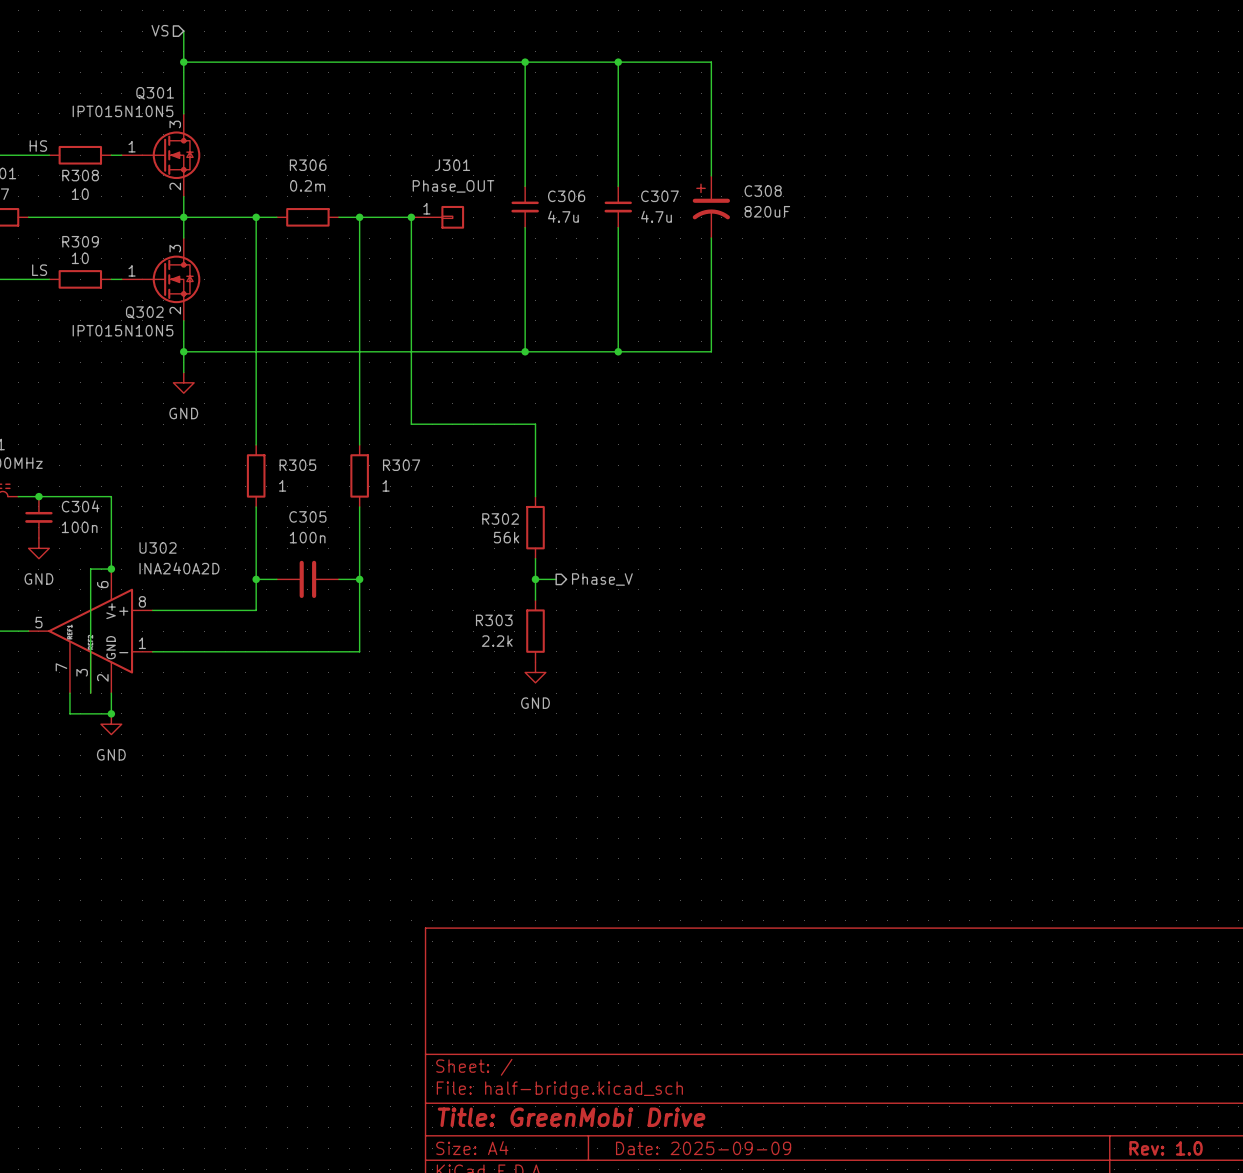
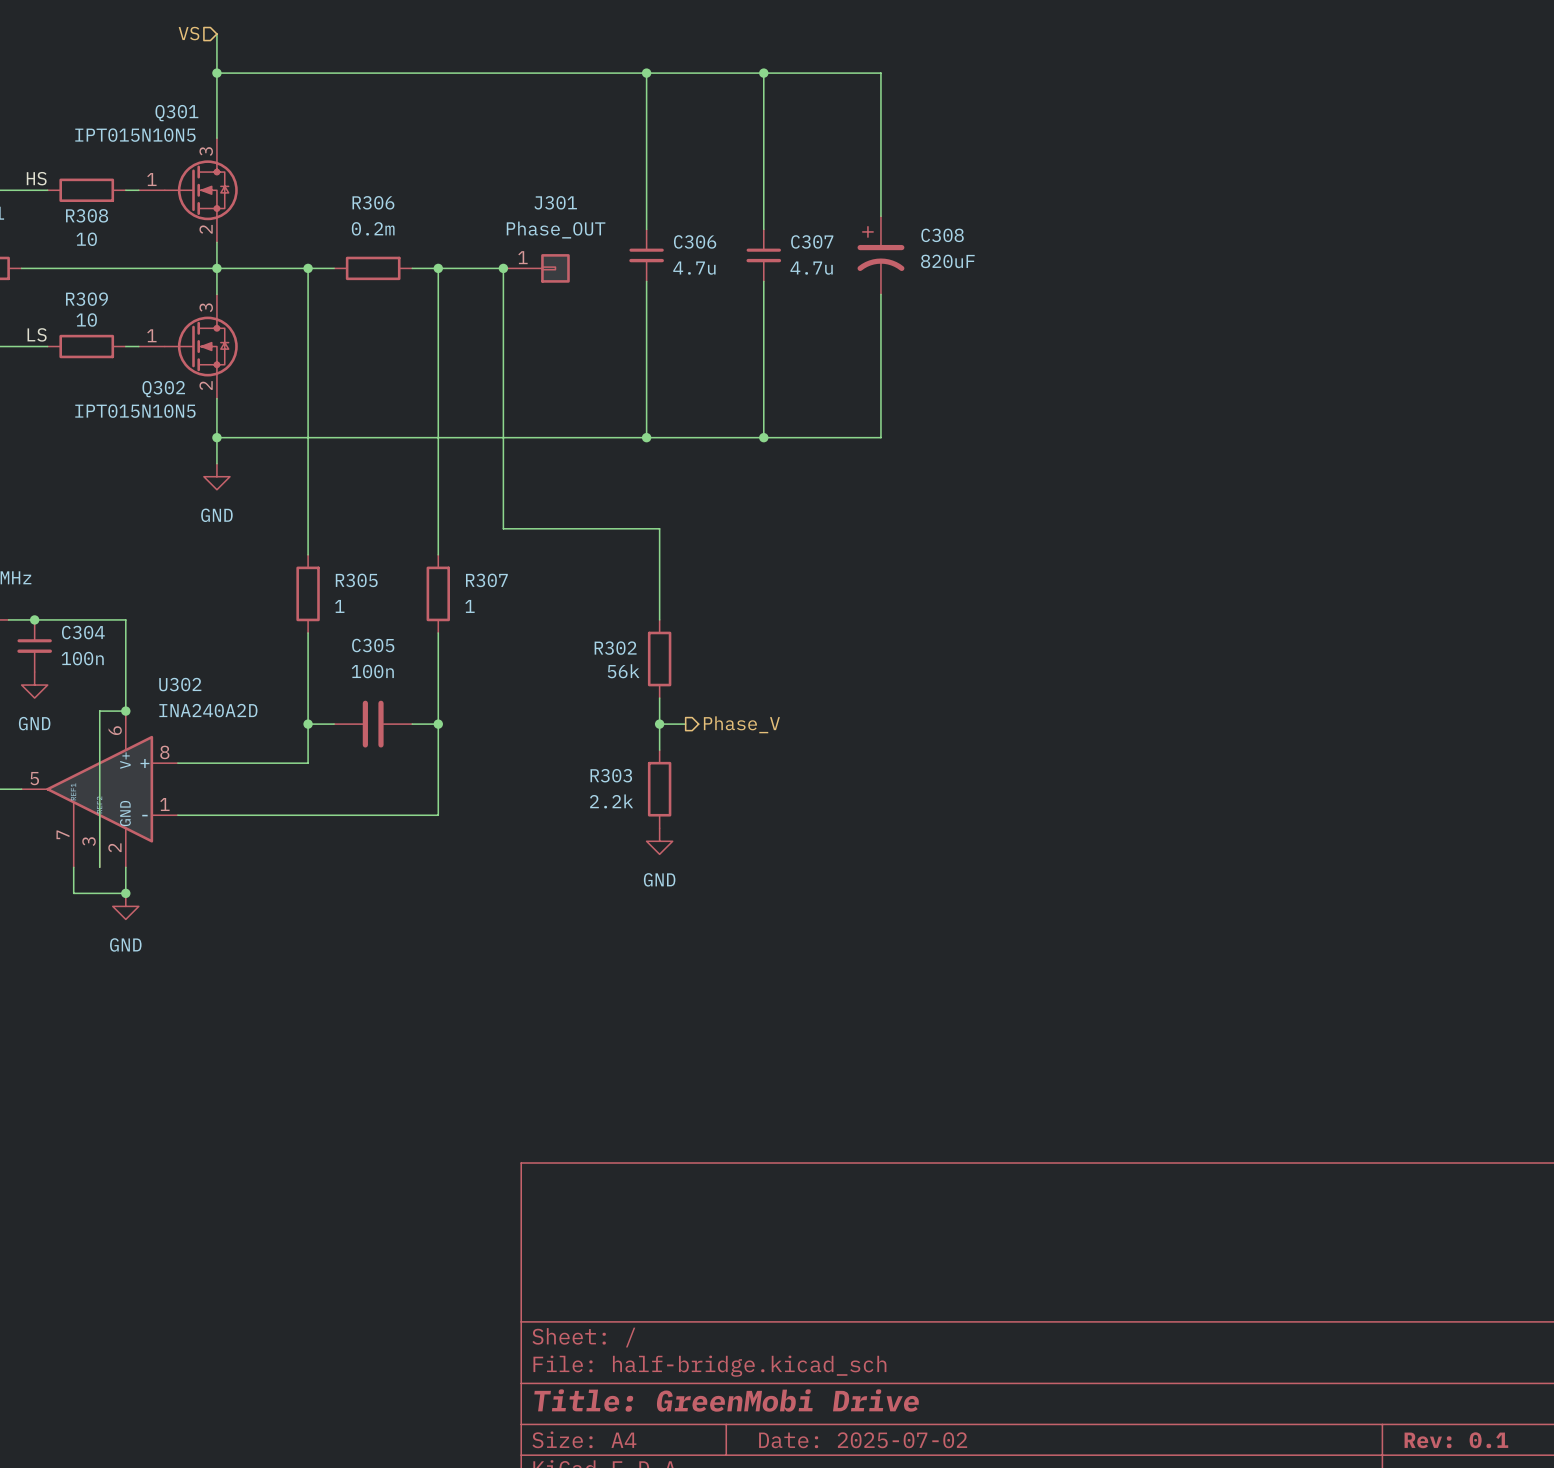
title block: Date: 2025-09-09 (703, 1148) -> Date: 2025-07-02 (863, 1440)
title block: Rev: 1.0 (1166, 1148) -> Rev: 0.1 (1456, 1440)

